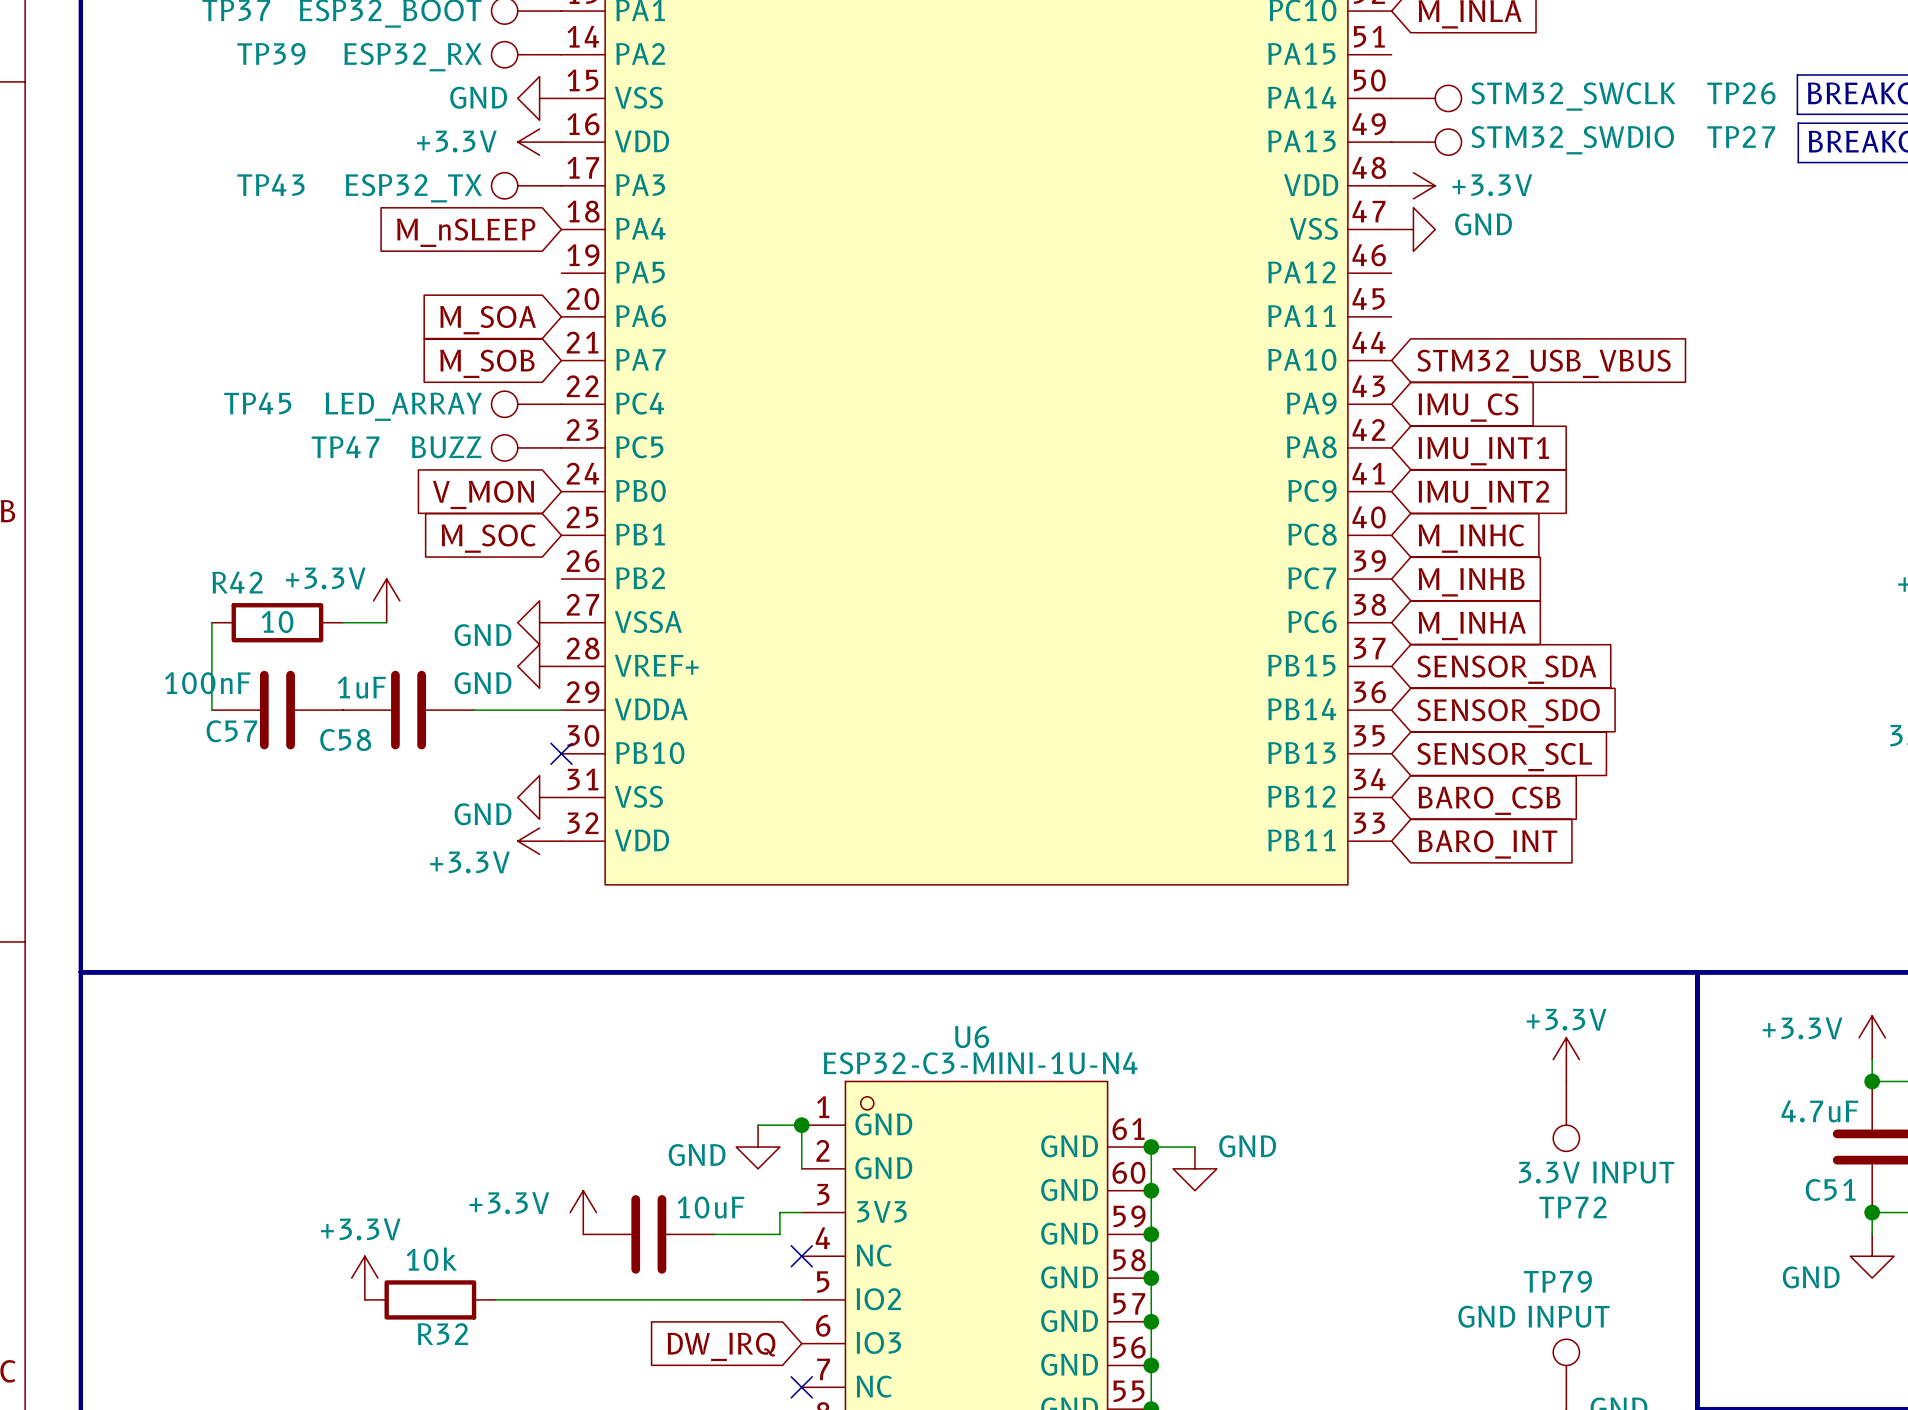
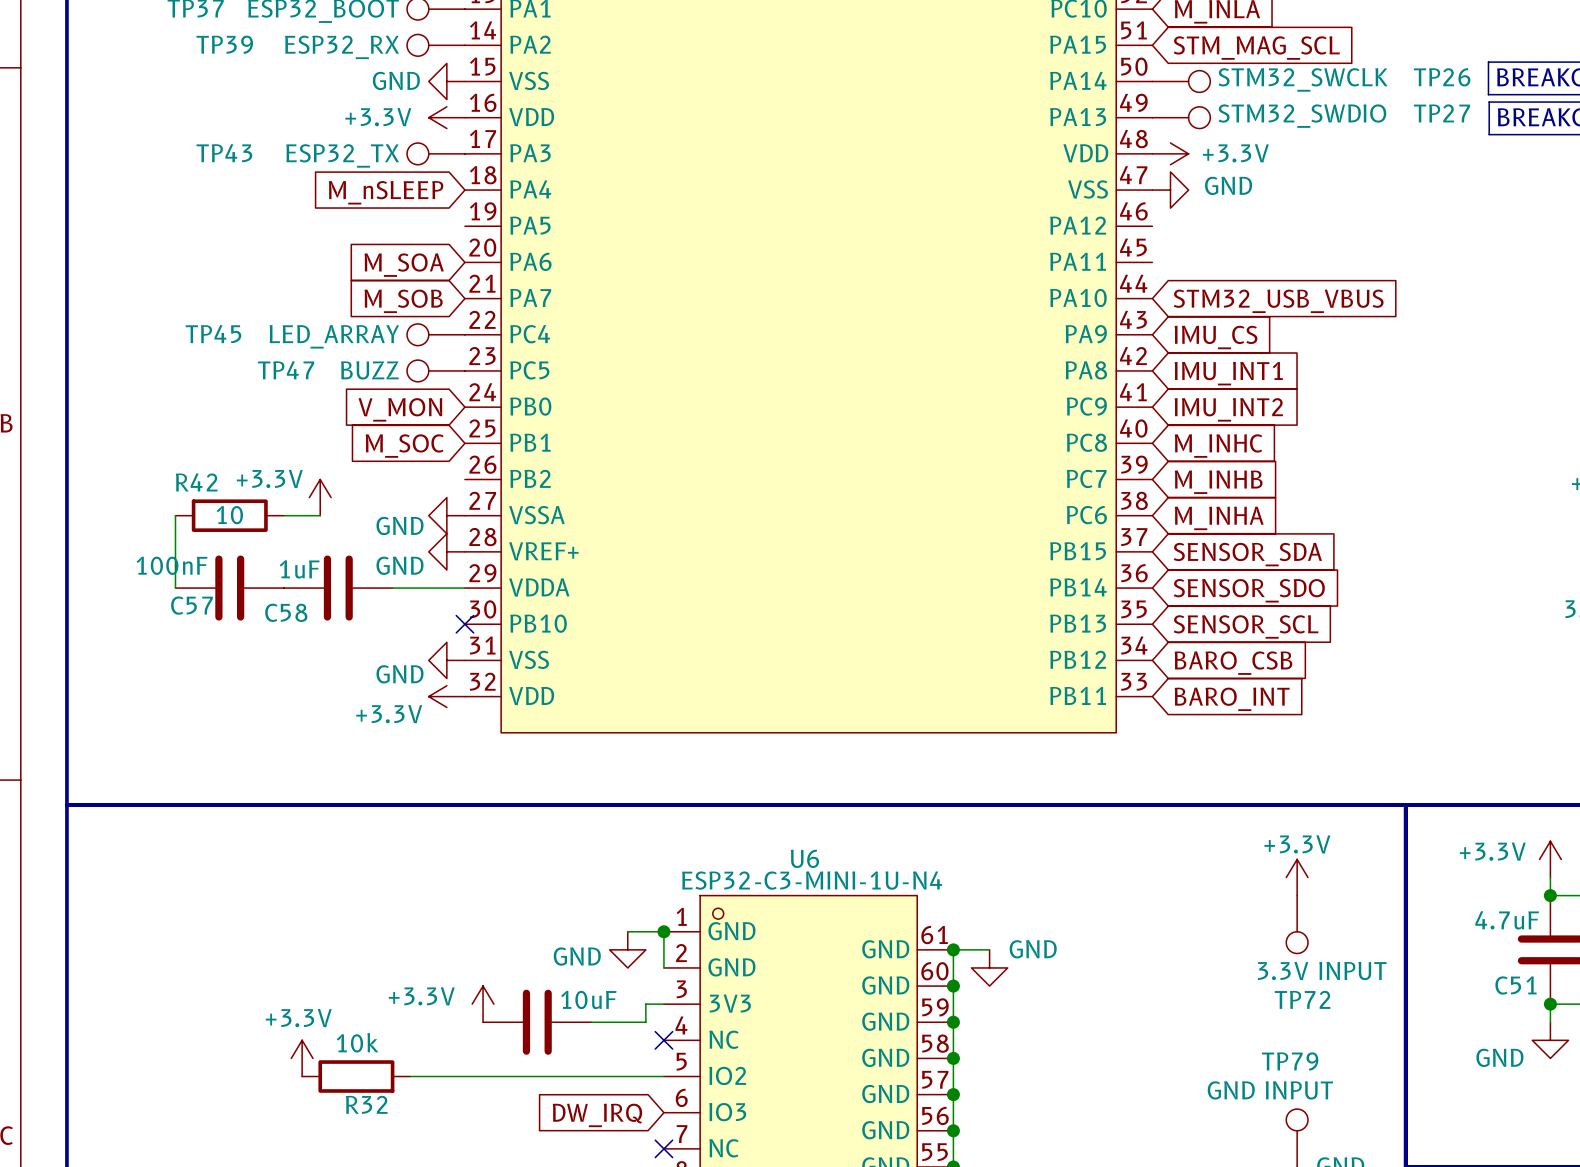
global label: none -> STM_MAG_SCL (1256, 48)

